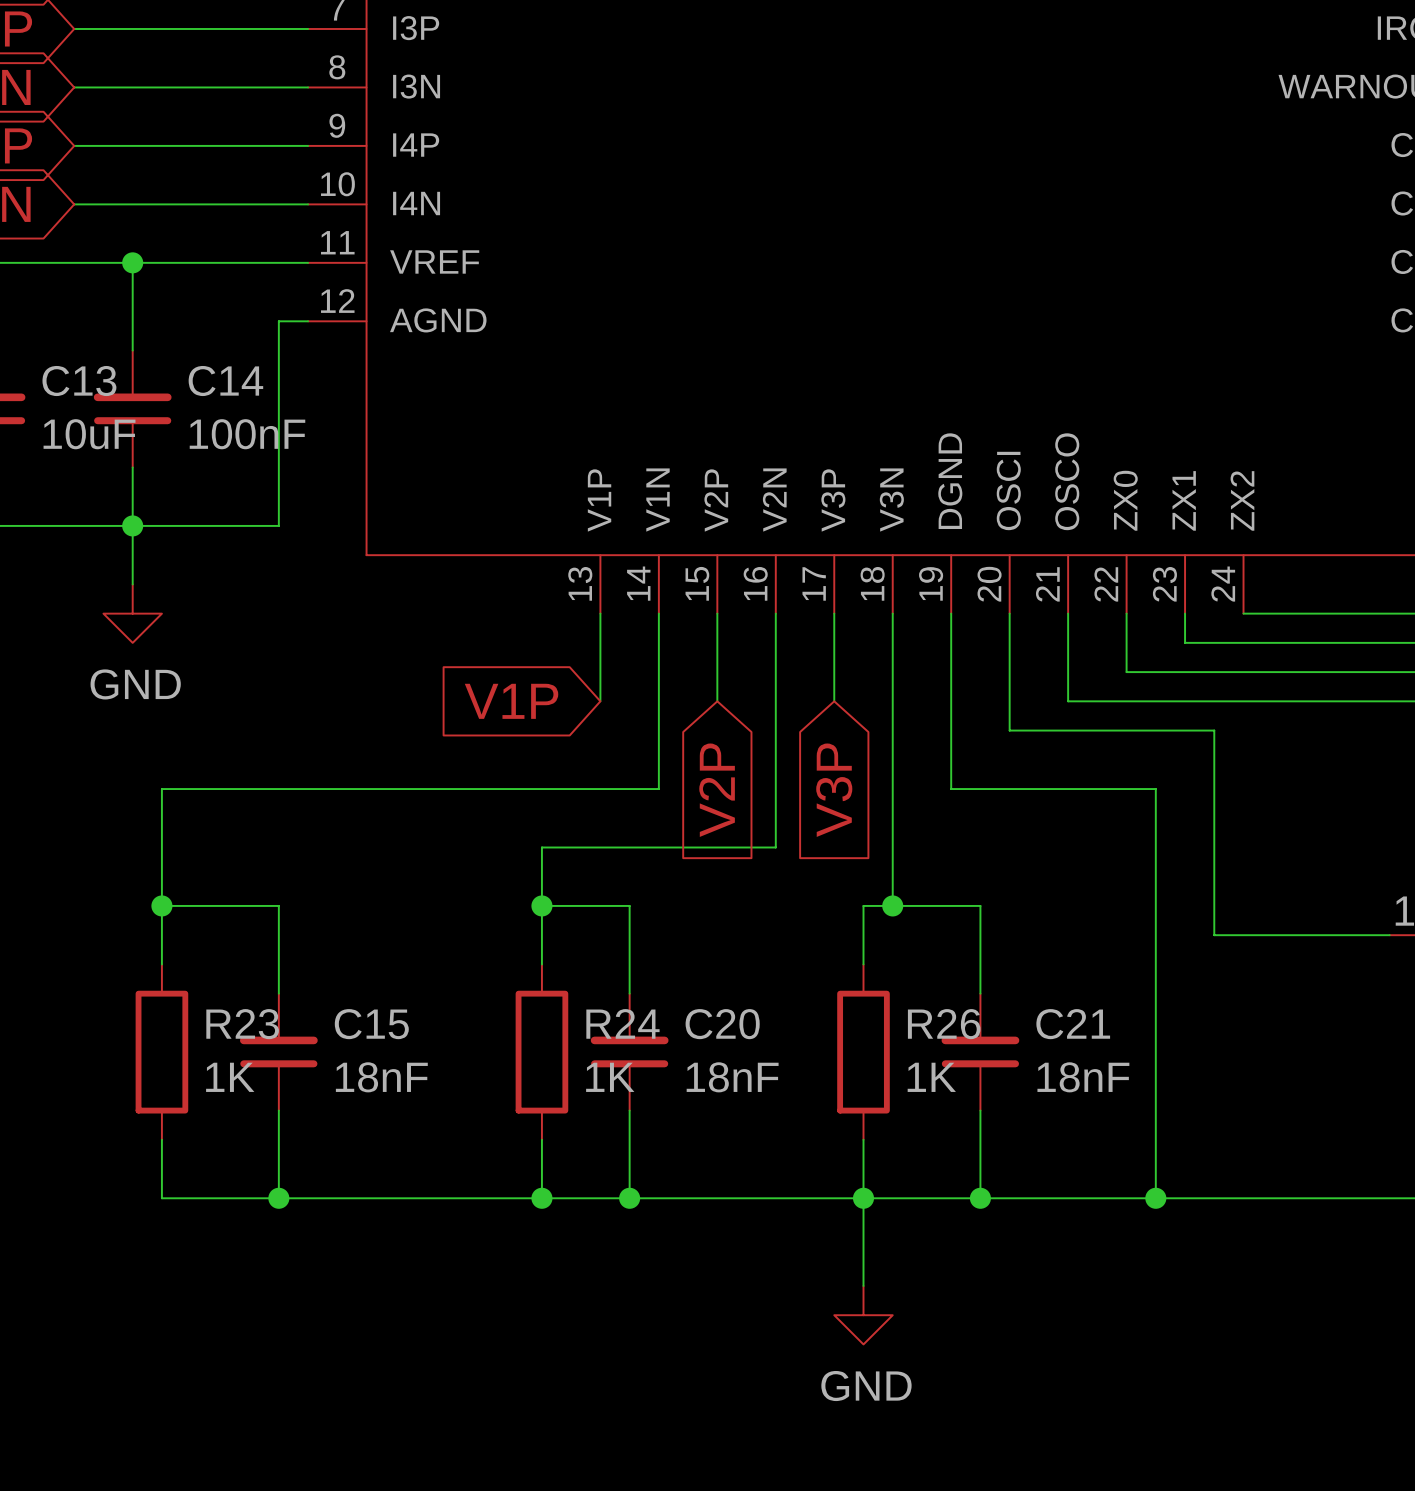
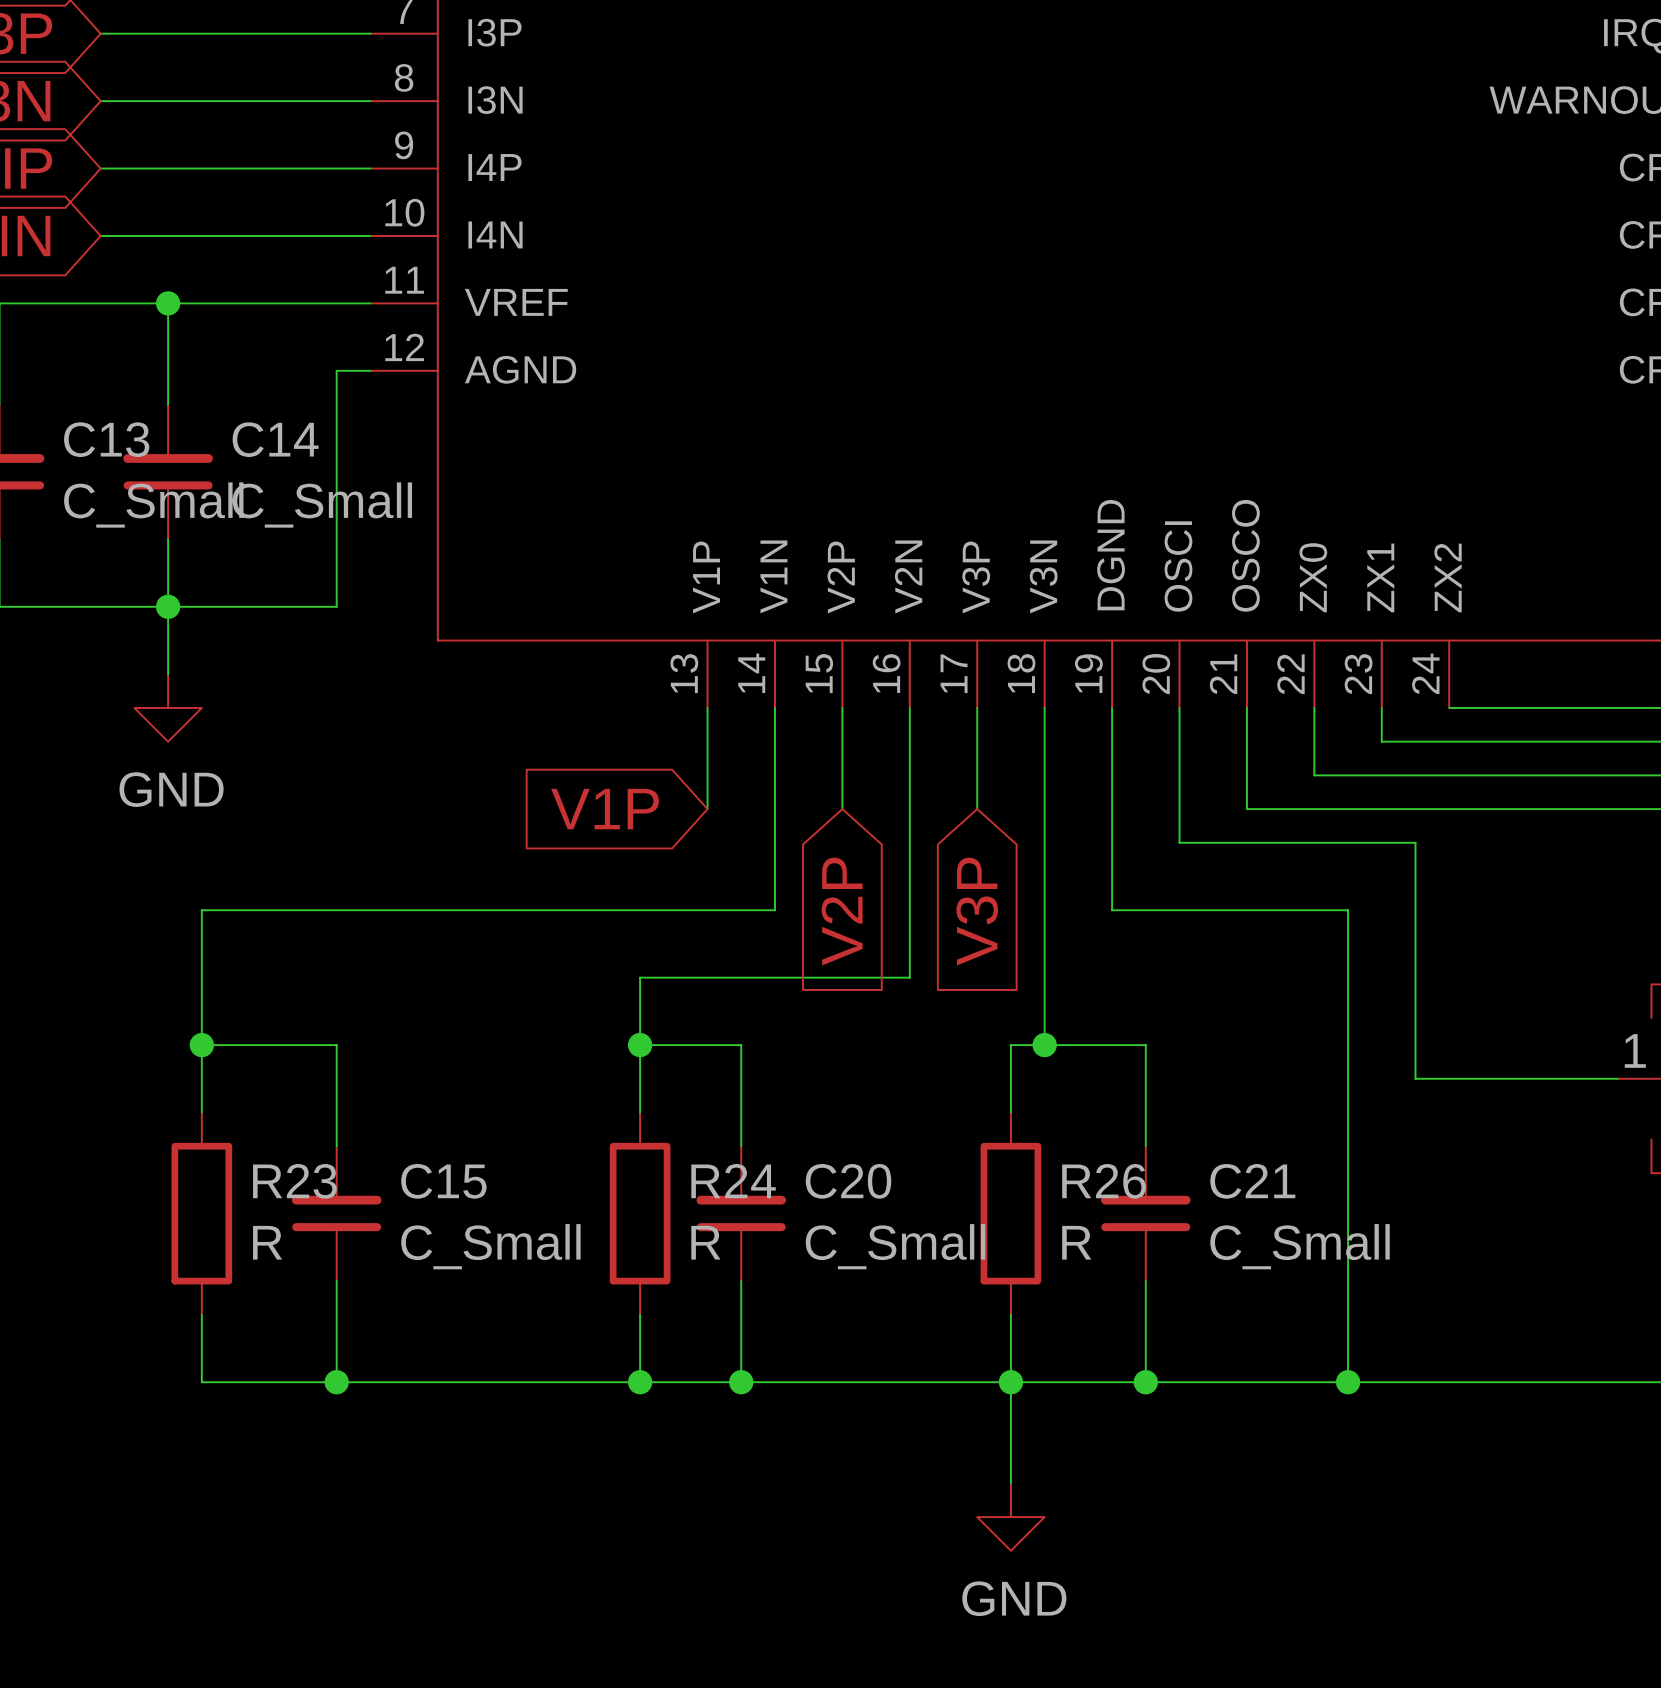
C13 value: 10uF (89, 434) -> C_Small (153, 505)
C14 value: 100nF (247, 434) -> C_Small (322, 505)
R23 value: 1K (230, 1077) -> R (267, 1242)
C15 value: 18nF (381, 1077) -> C_Small (490, 1246)
R24 value: 1K (610, 1077) -> R (705, 1242)
C20 value: 18nF (732, 1077) -> C_Small (895, 1246)
R26 value: 1K (931, 1077) -> R (1076, 1242)
C21 value: 18nF (1083, 1077) -> C_Small (1300, 1246)

